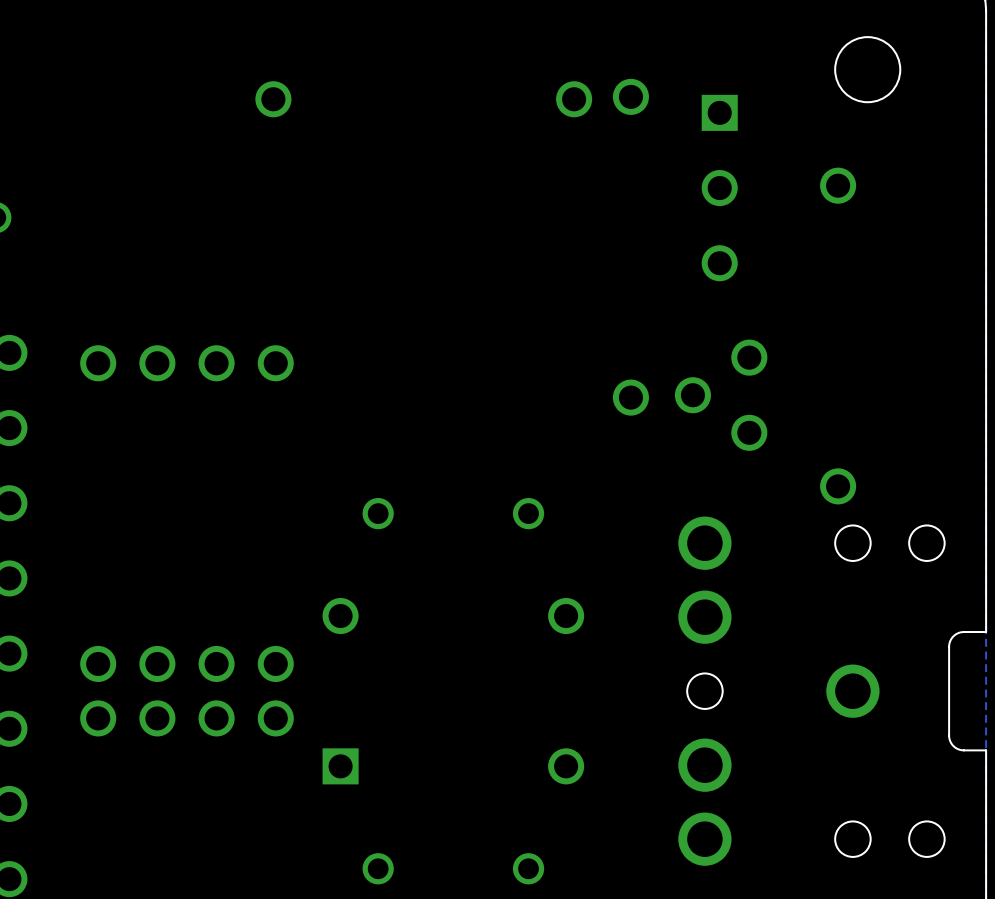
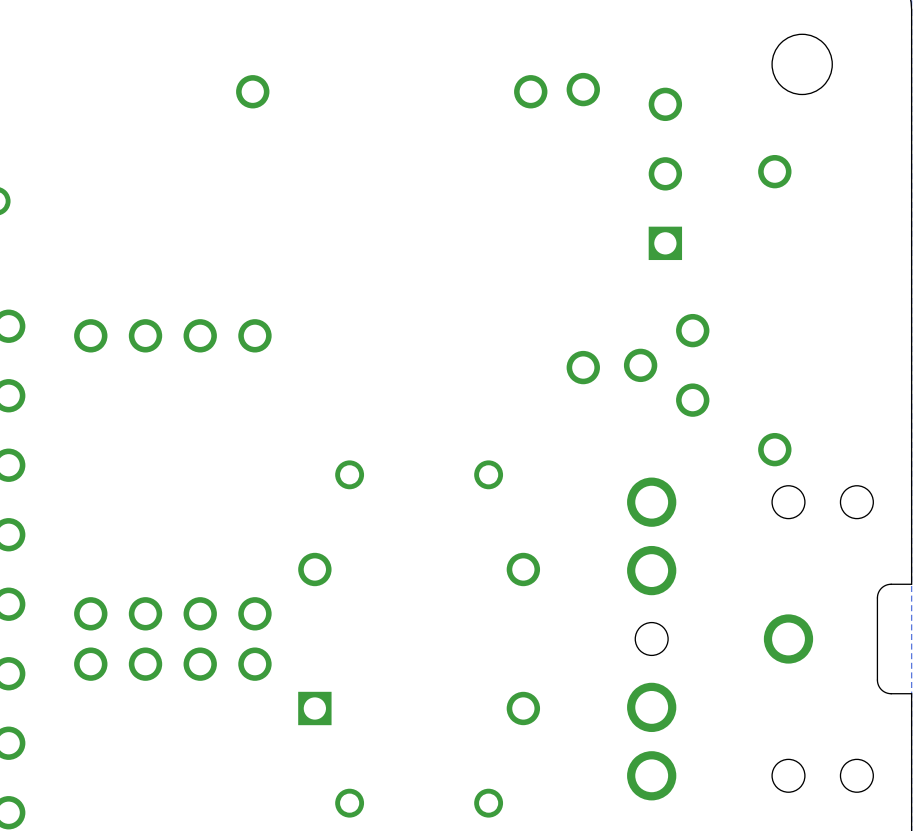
part rotation: 0° (719, 188) -> 180° (665, 173)

